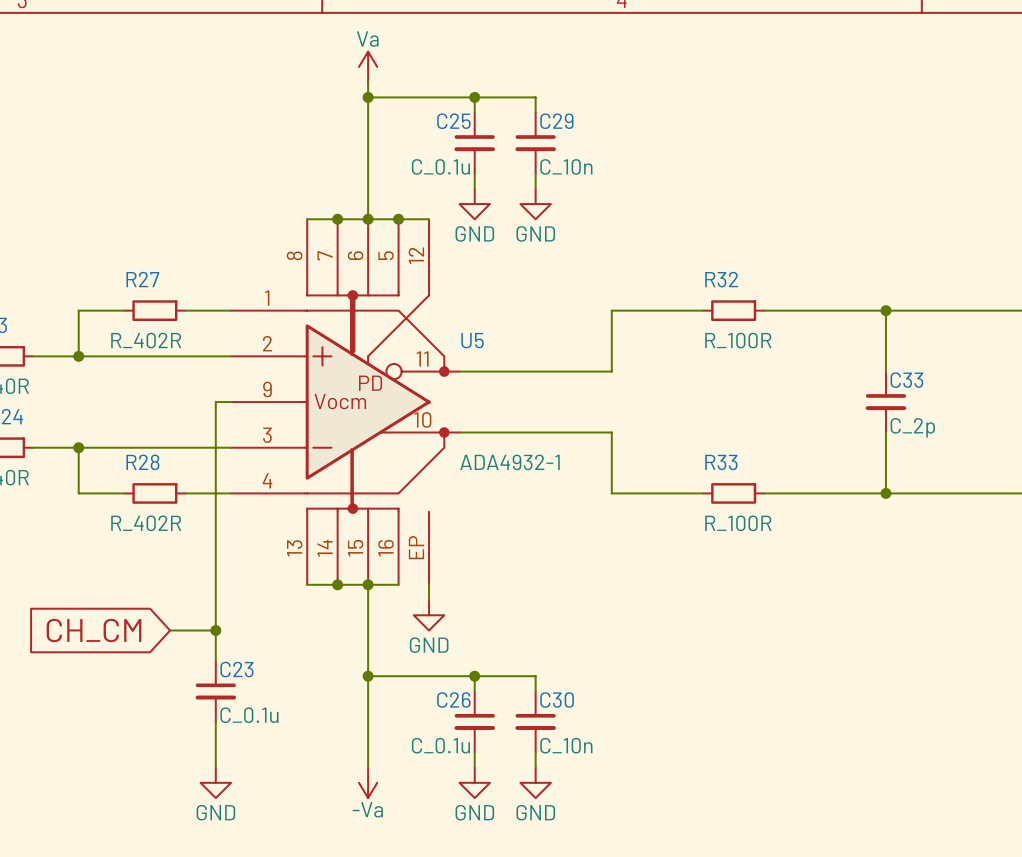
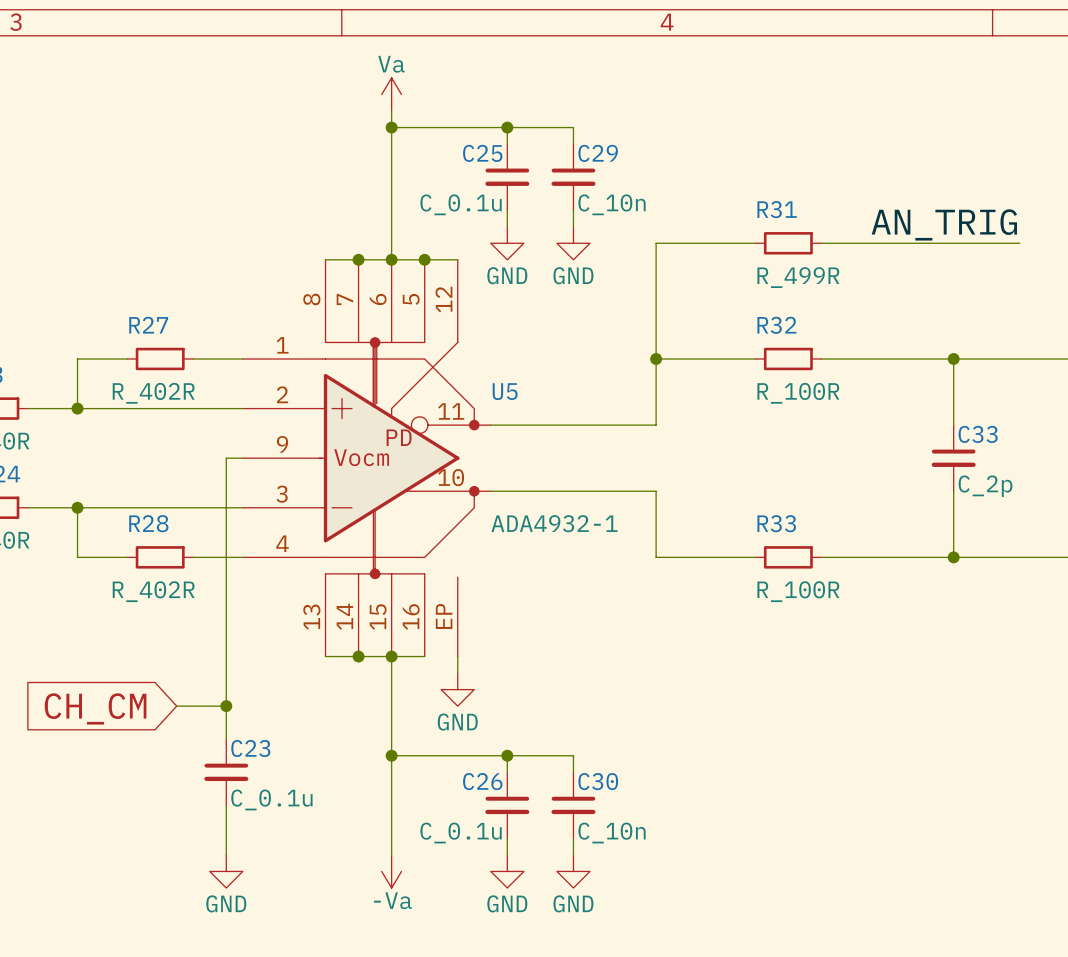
label: none -> AN_TRIG (944, 224)
wire: none -> (755, 243) (656, 243) (656, 358)
R31: none -> R_499R (788, 243)
wire: none -> (821, 243) (1019, 243)
junction: none -> (656, 358)

